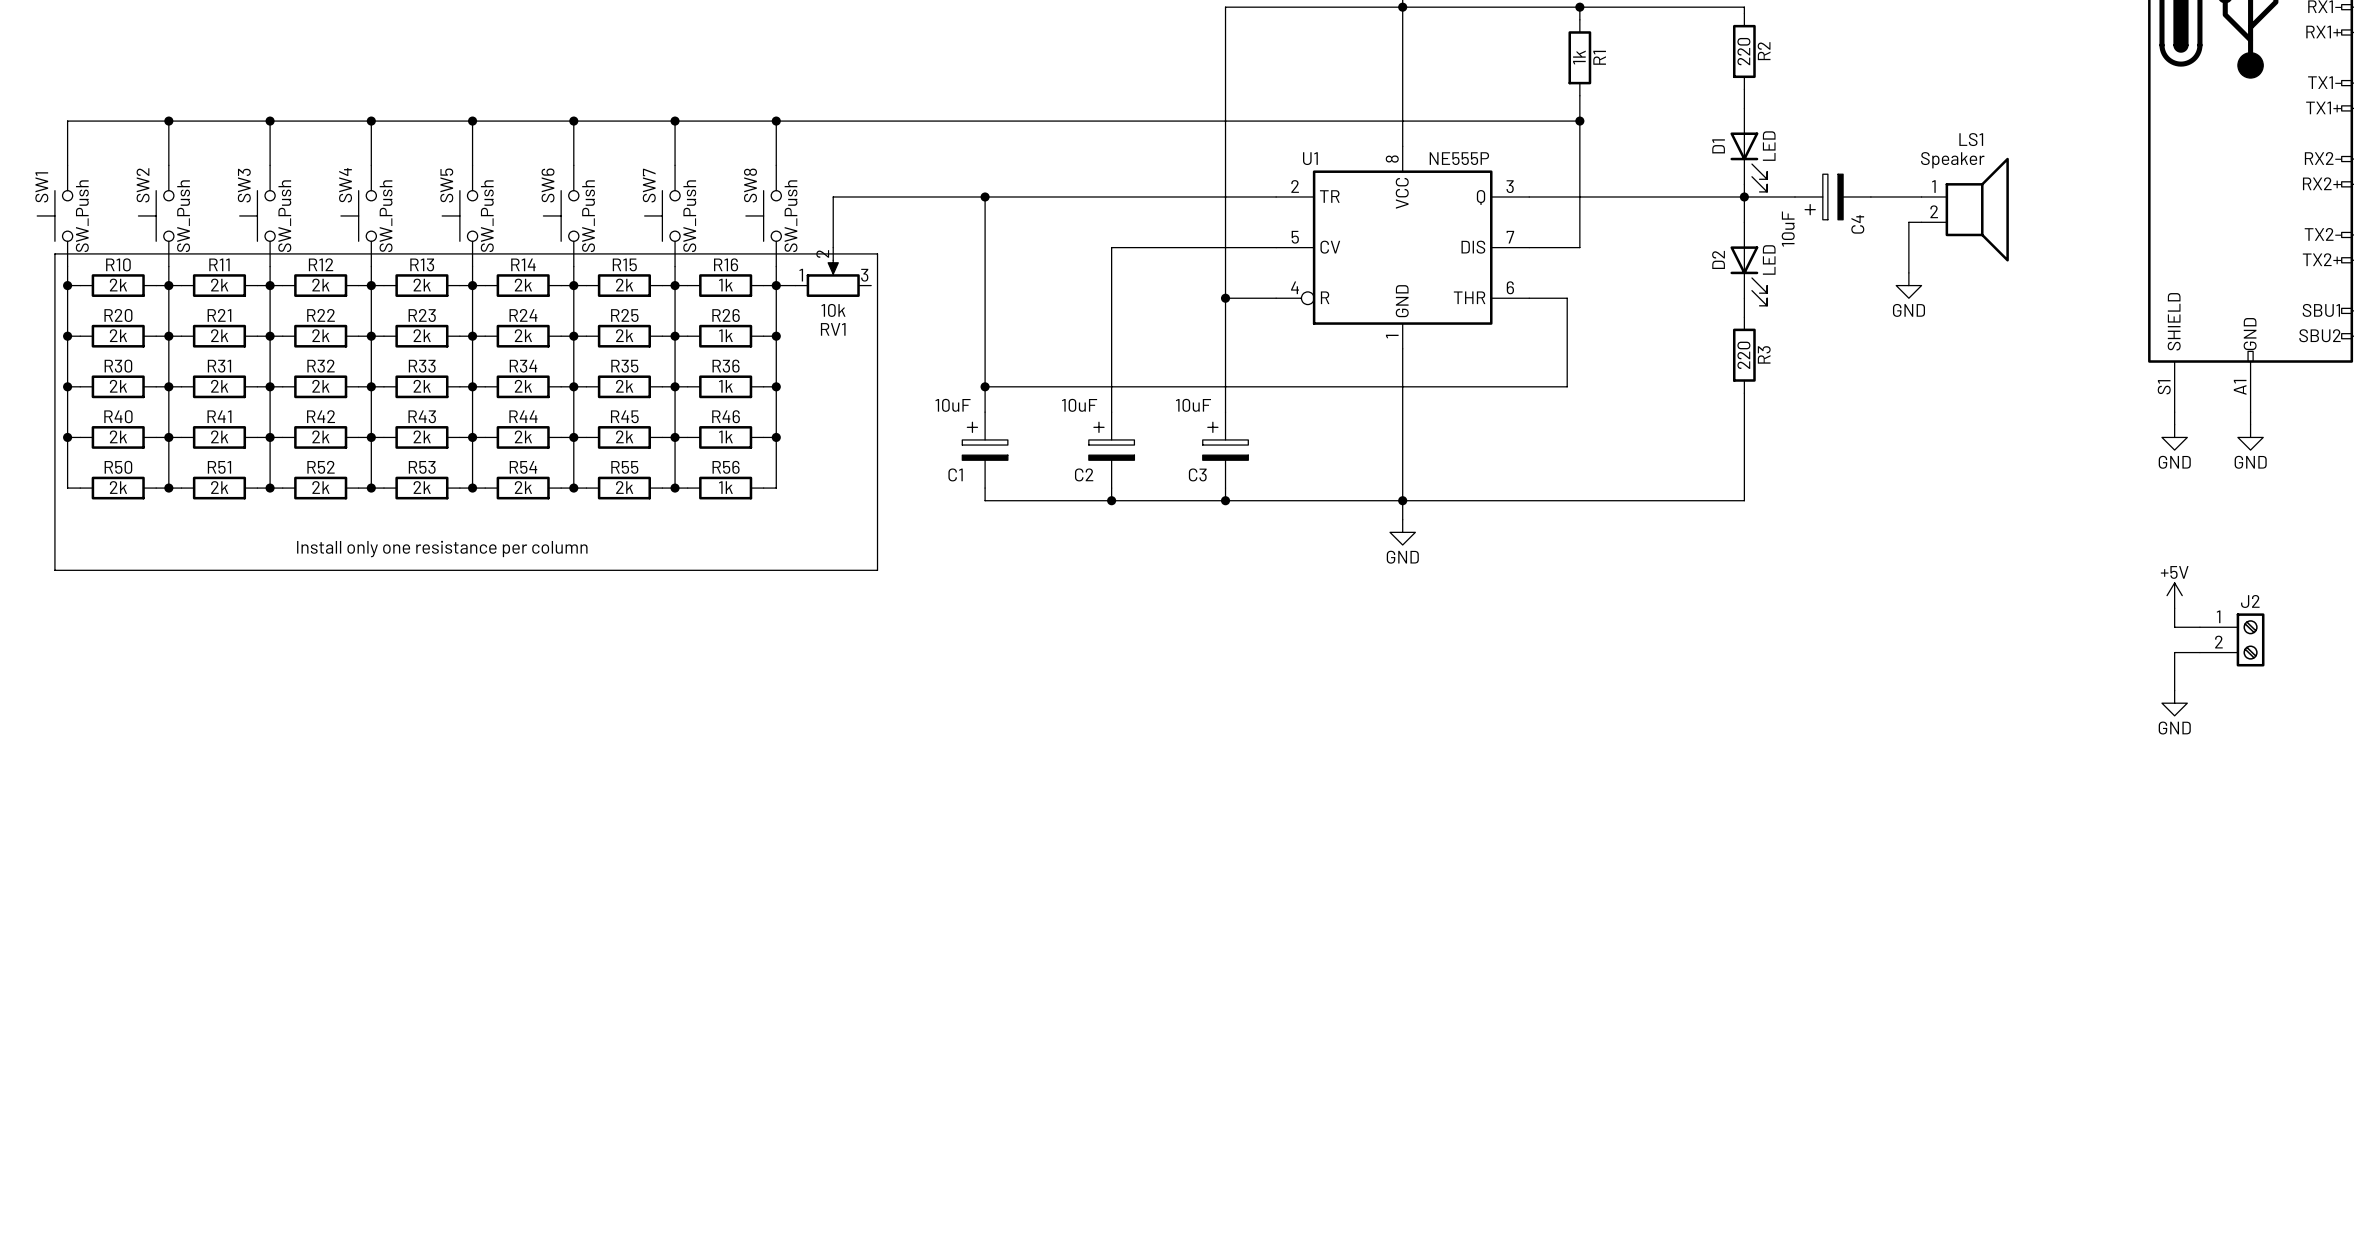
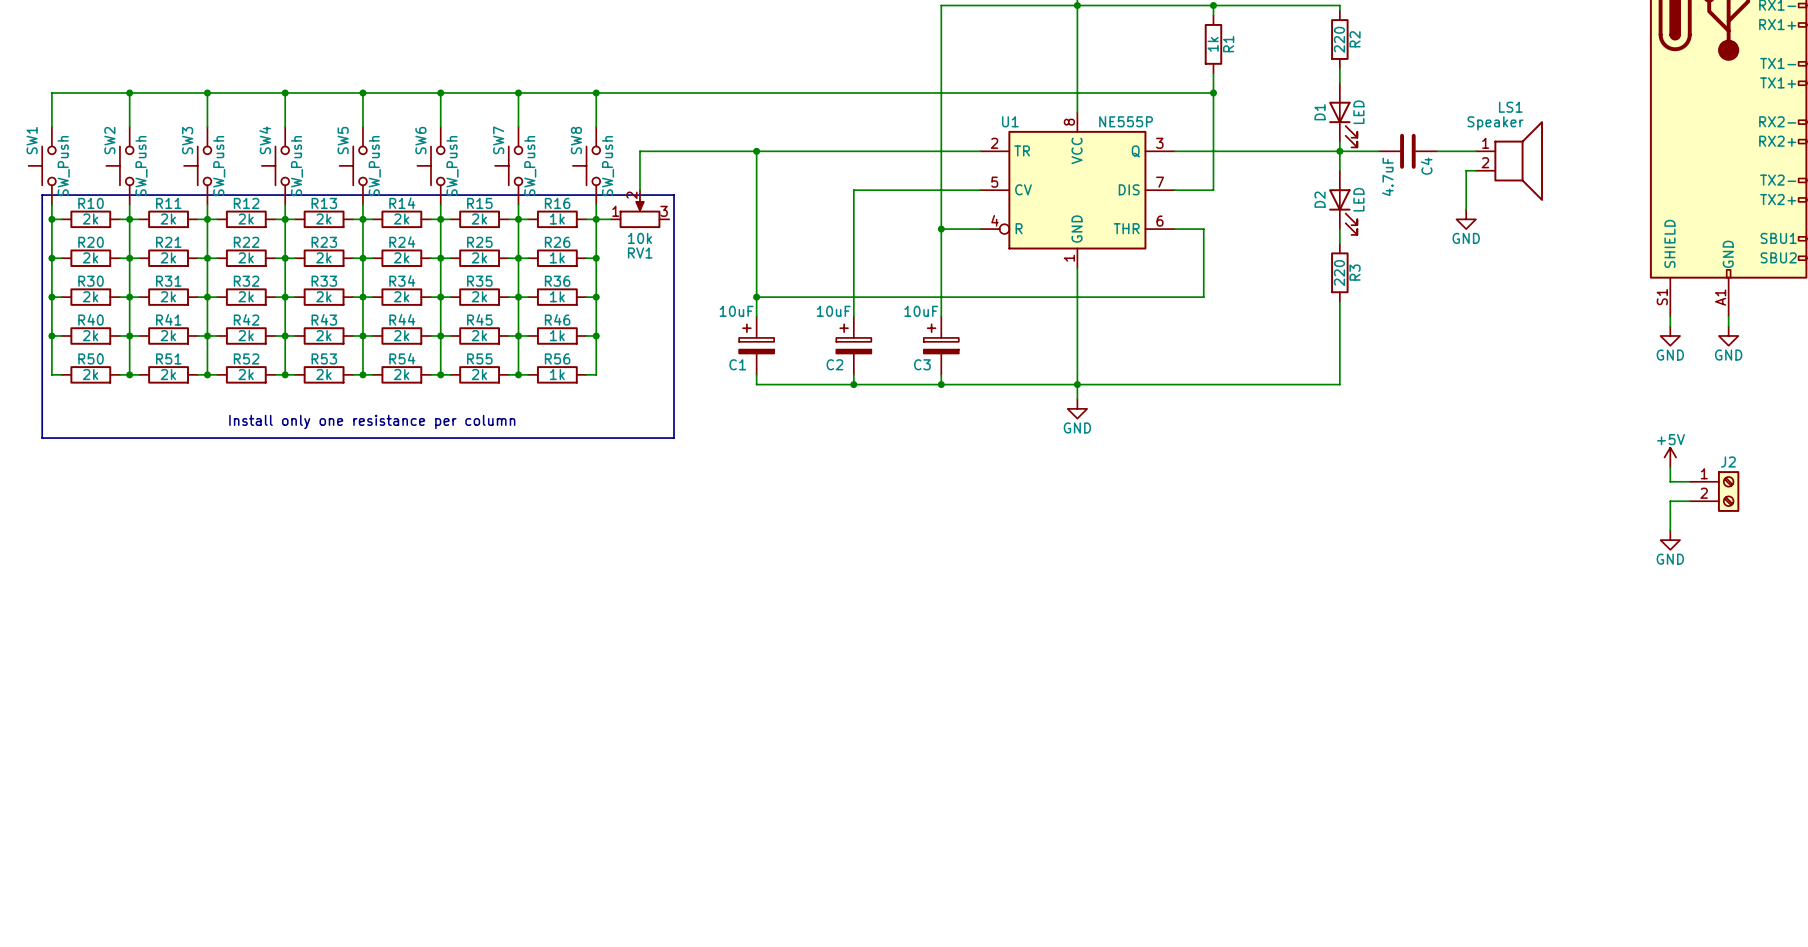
C4 symbol: [1794, 174, 1871, 220] -> [1378, 133, 1438, 169]
C4 value: 10uF (1788, 229) -> 4.7uF (1387, 176)

